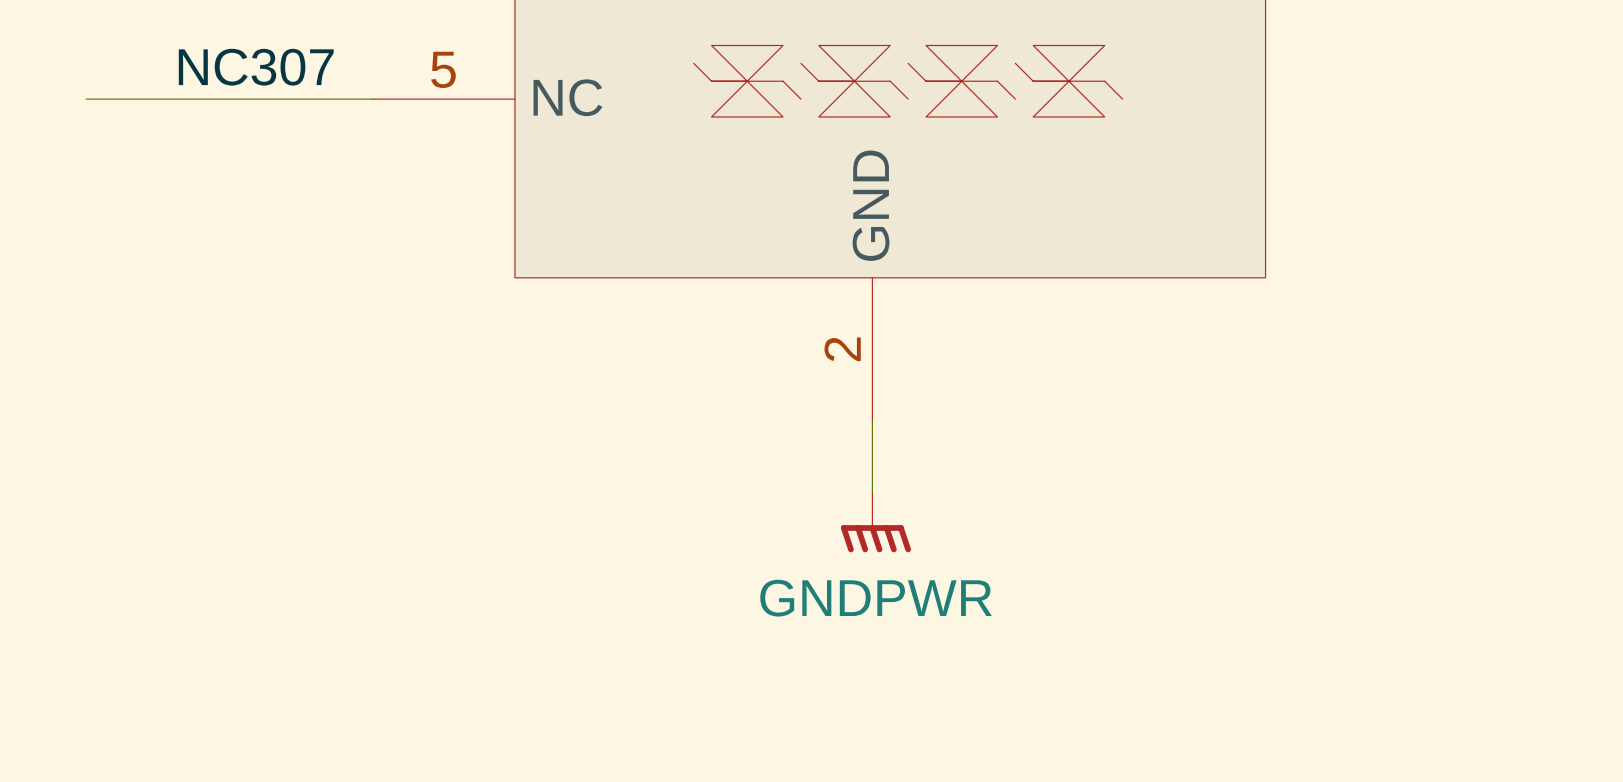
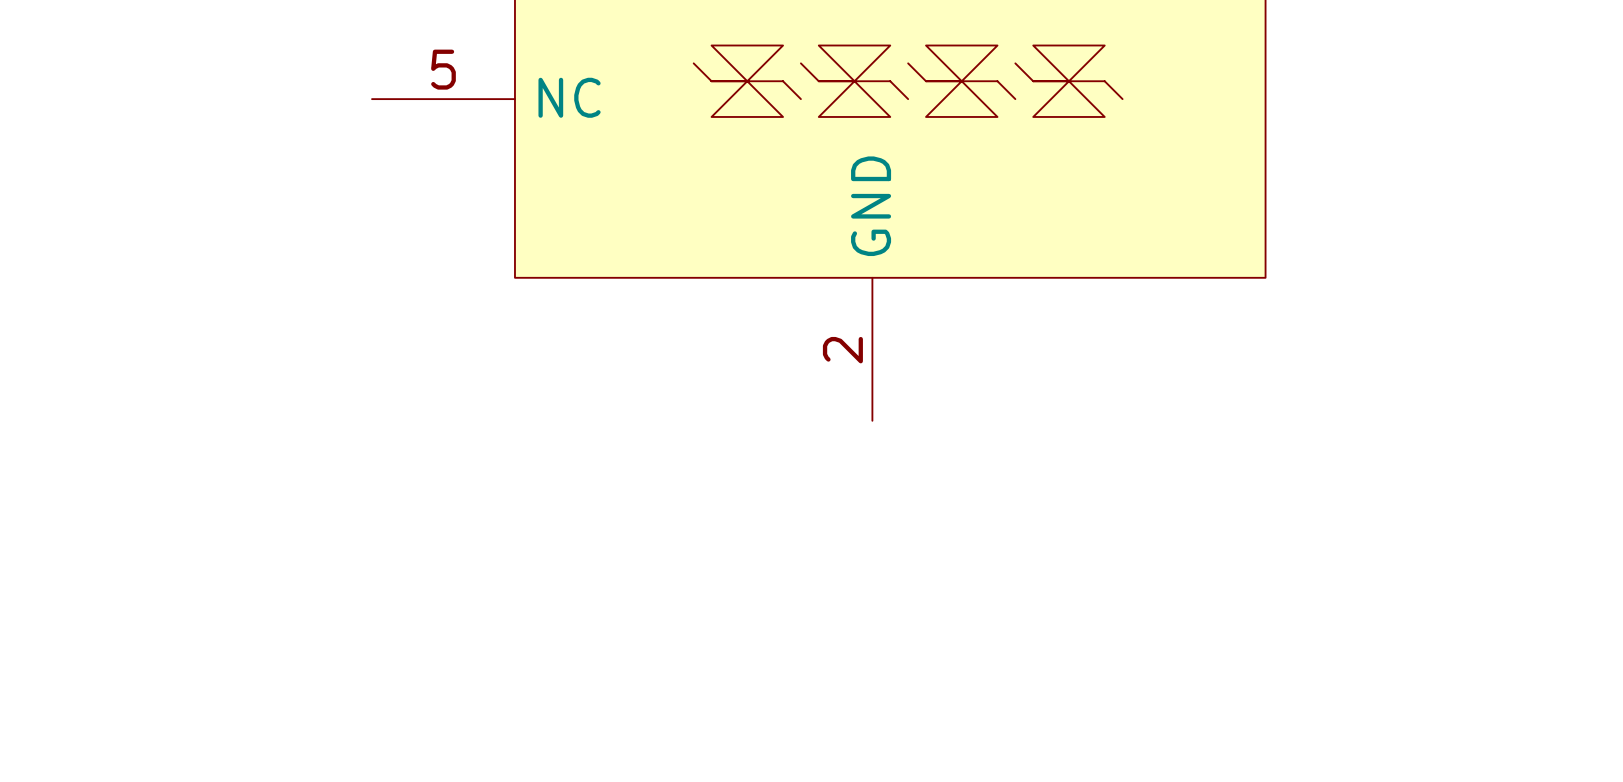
label: NC307 (256, 67) -> none
wire: (86, 99) (372, 99) -> none
wire: (872, 420) (872, 492) -> none
power symbol: GNDPWR (875, 522) -> none

